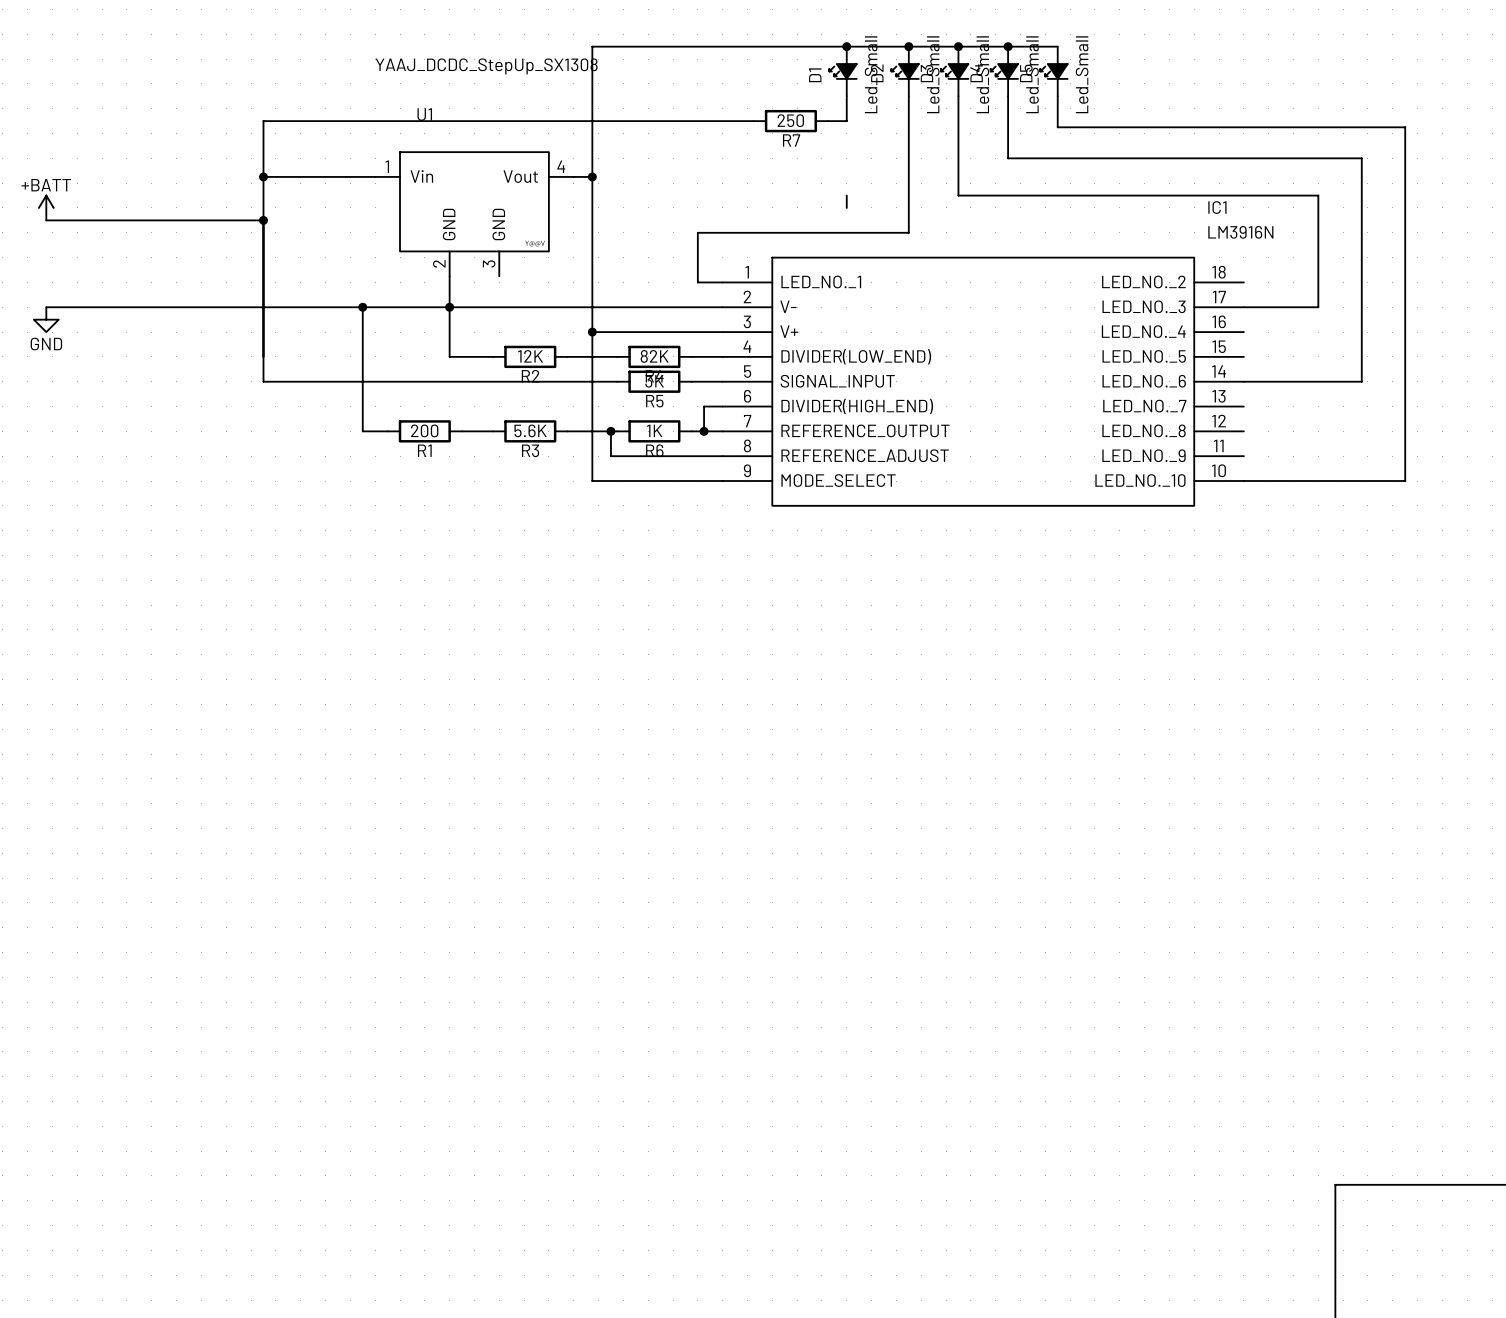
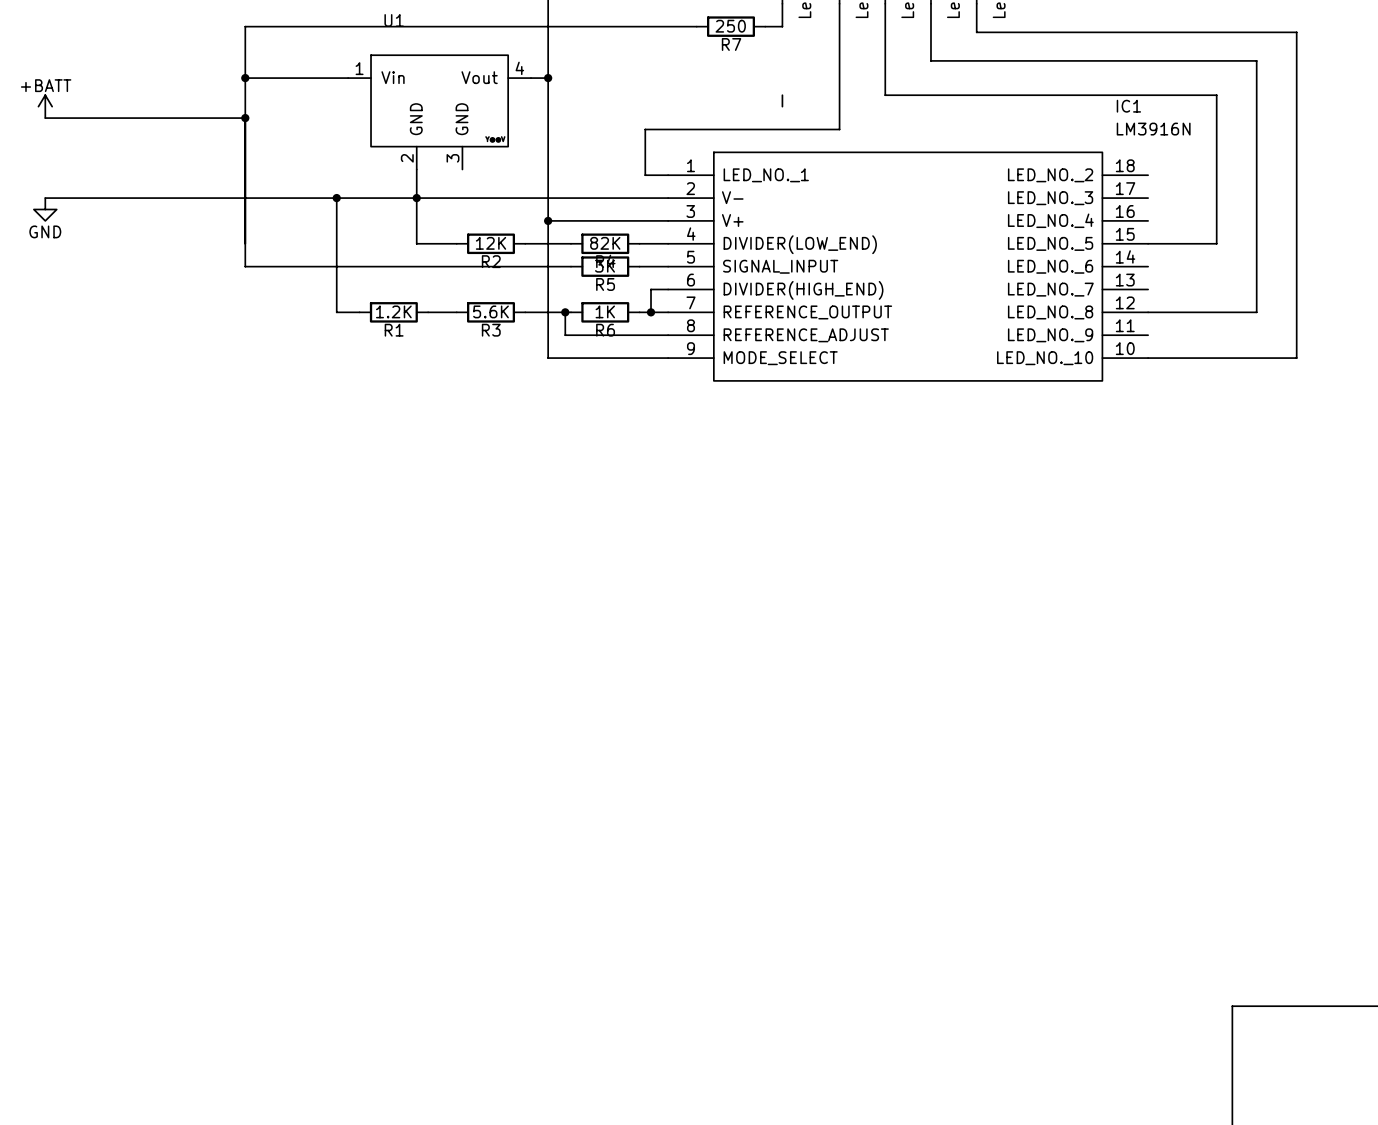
wire: (1243, 307) (1318, 307) -> (1148, 243) (1216, 243) (1216, 198)
wire: (1243, 381) (1361, 381) -> (1148, 312) (1256, 312) (1256, 266)
R1 value: 200 (424, 430) -> 1.2K (393, 311)

